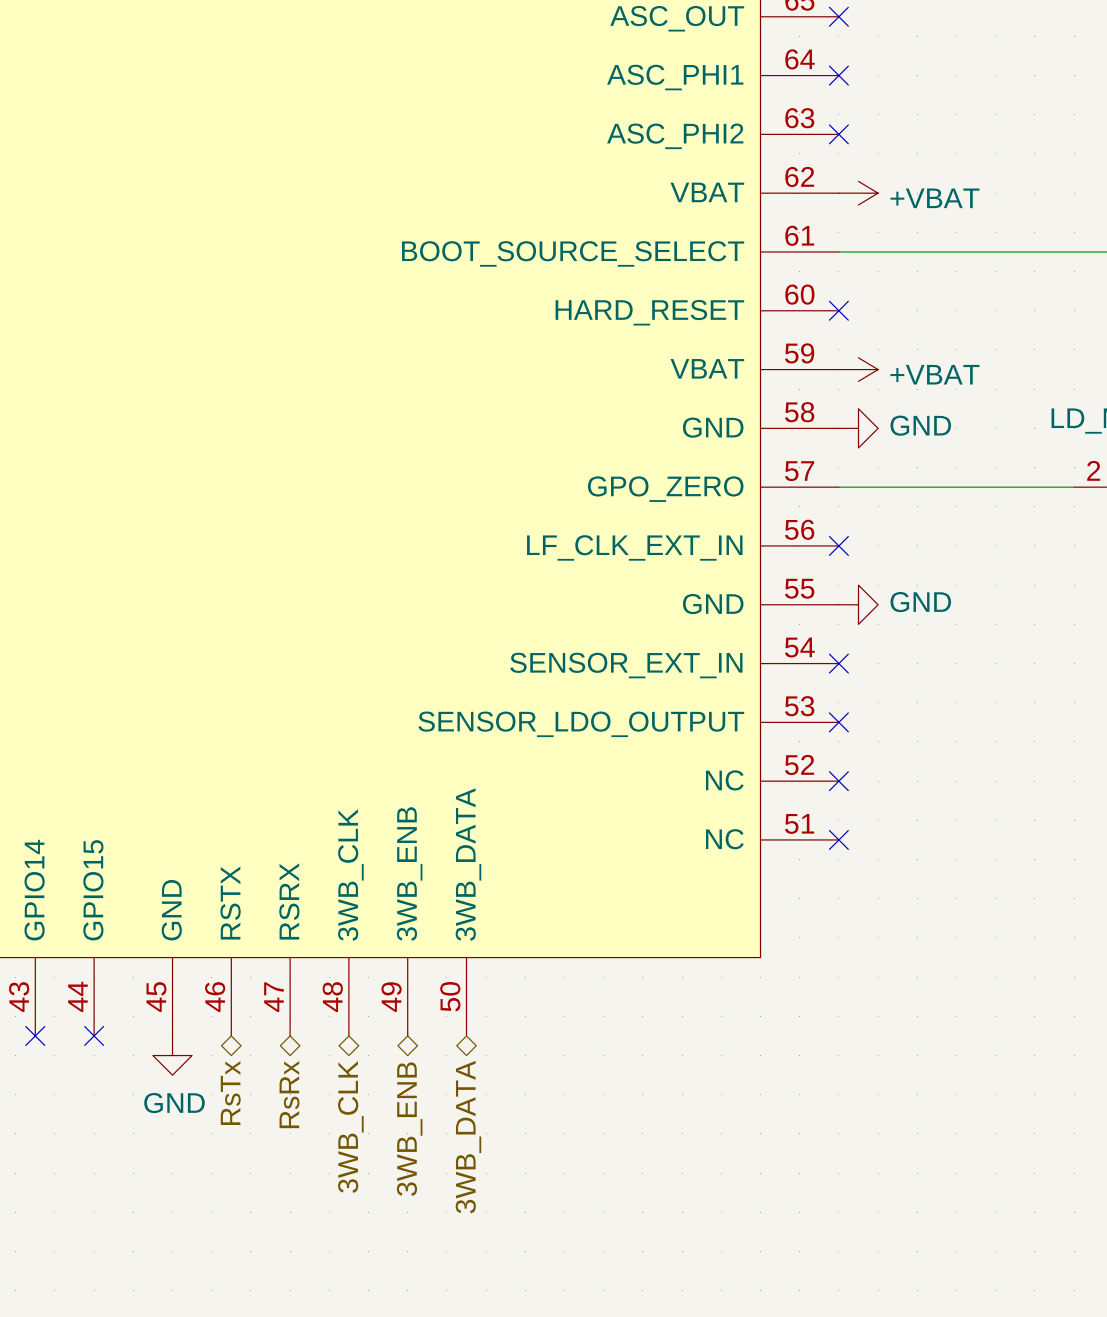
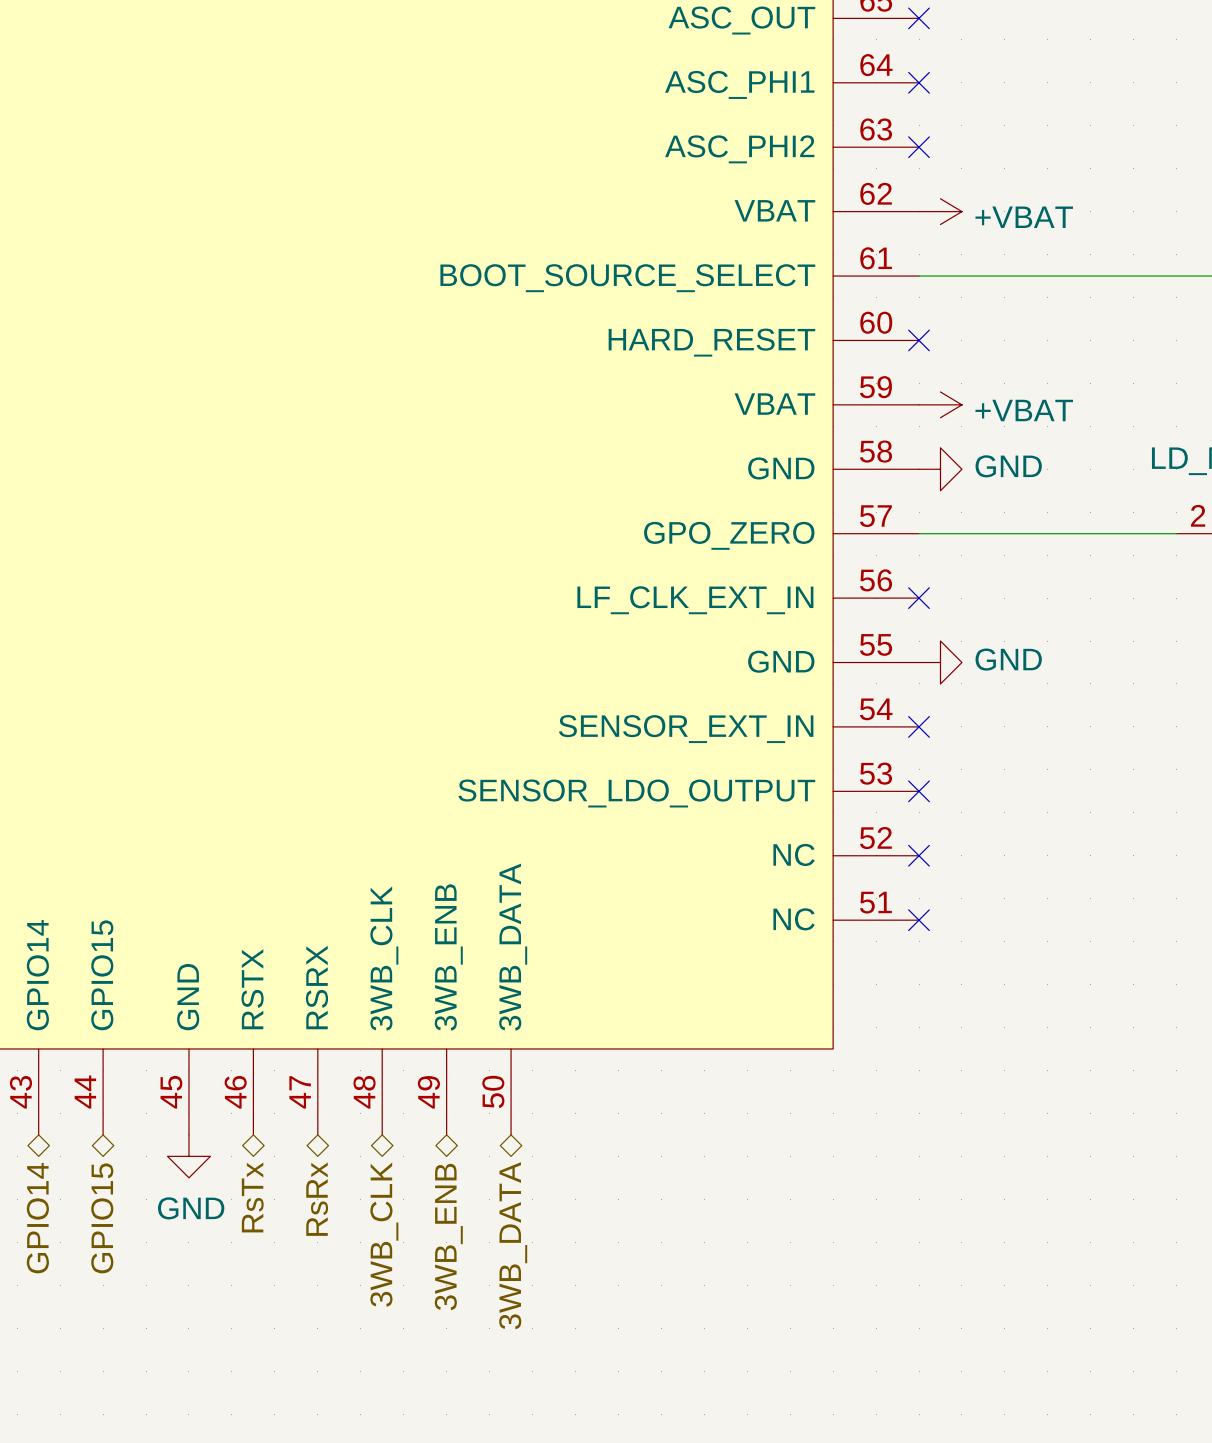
no-connect mark: (35, 1035) -> none
no-connect mark: (94, 1035) -> none
hierarchical label: none -> GPIO14 (37, 1218)
hierarchical label: none -> GPIO15 (102, 1218)

